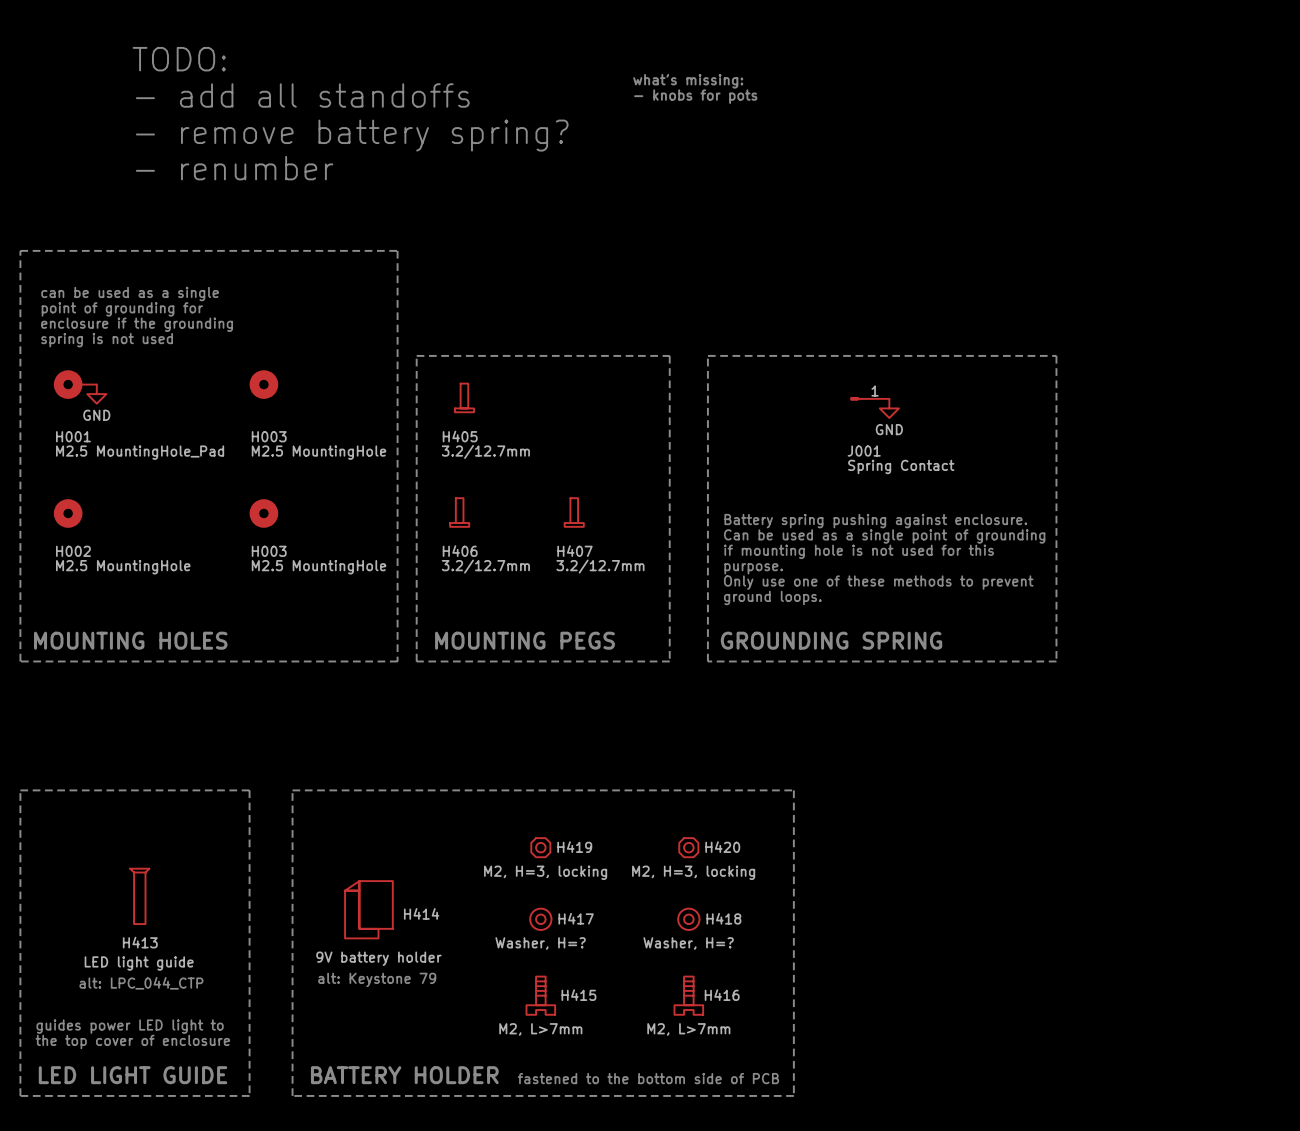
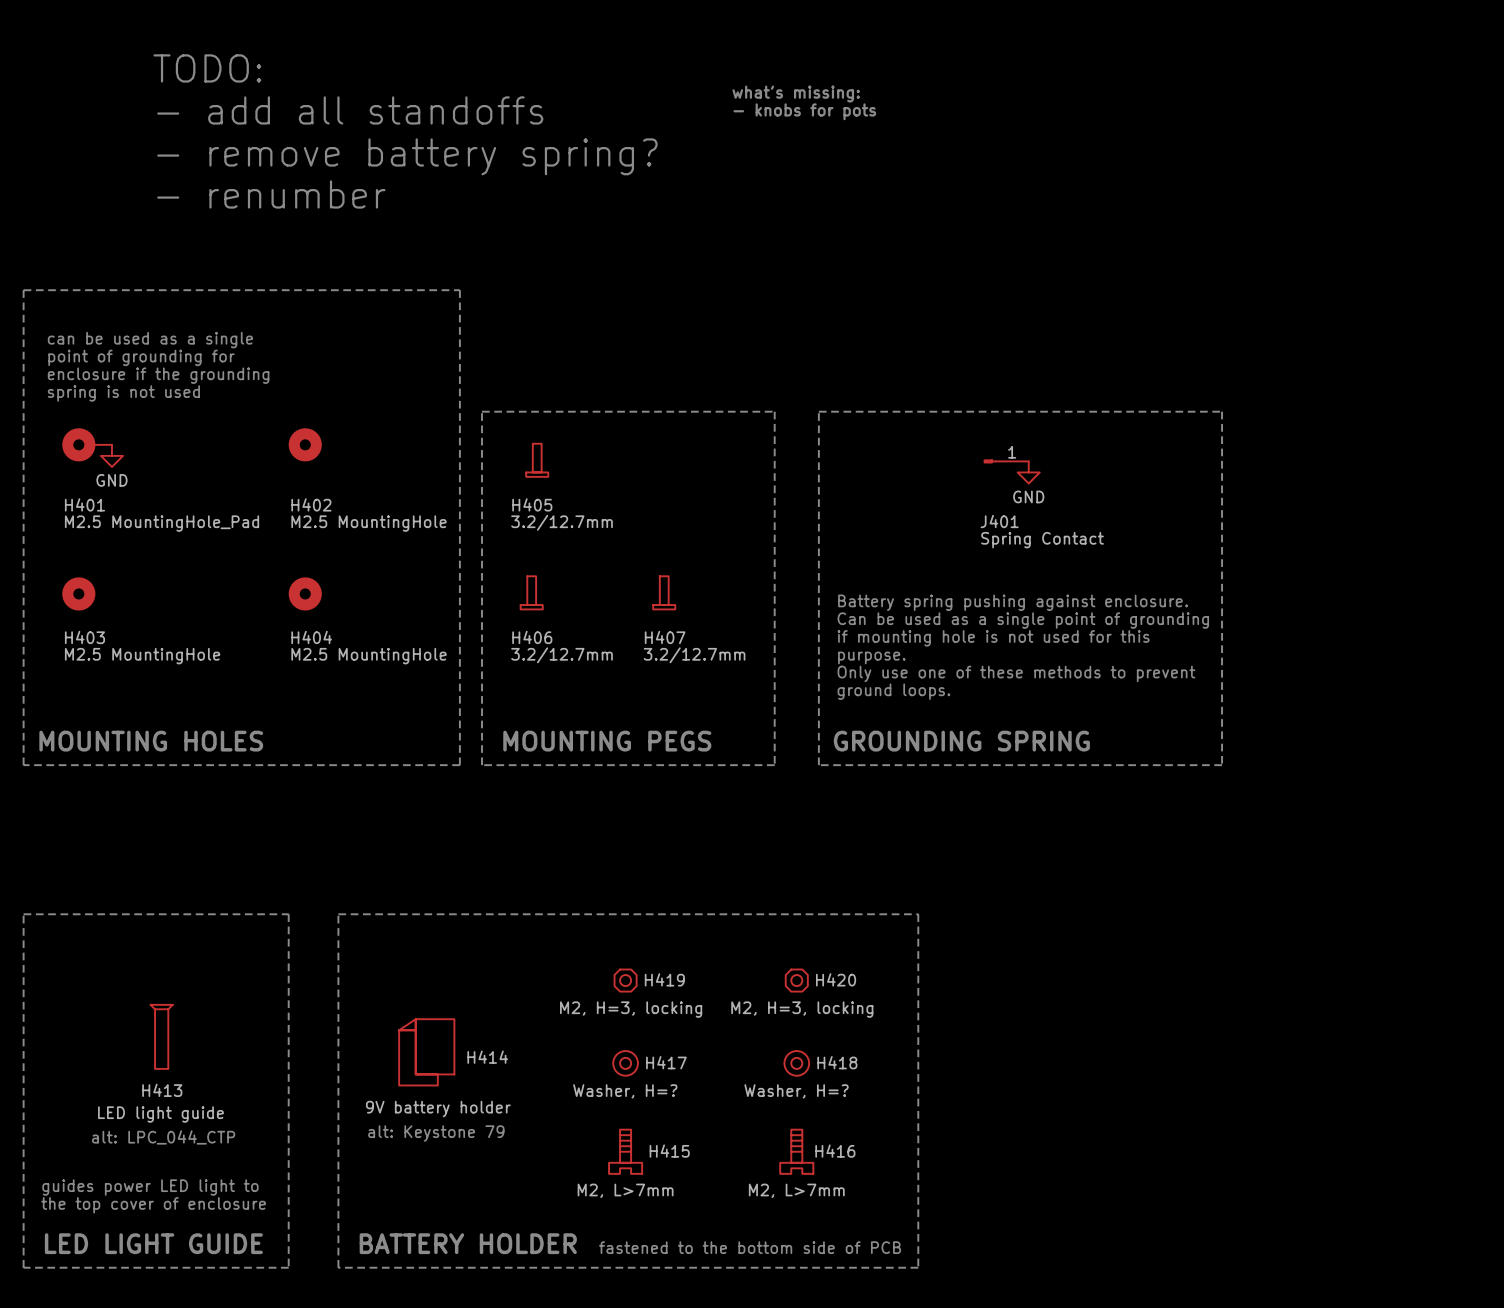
H001 name: H001 (73, 436) -> H401 (84, 504)
H003 name: H003 (269, 436) -> H402 (311, 504)
J001 name: J001 (864, 451) -> J401 (999, 521)
H002 name: H002 (73, 551) -> H403 (84, 637)
H003 name: H003 (269, 551) -> H404 (311, 637)

